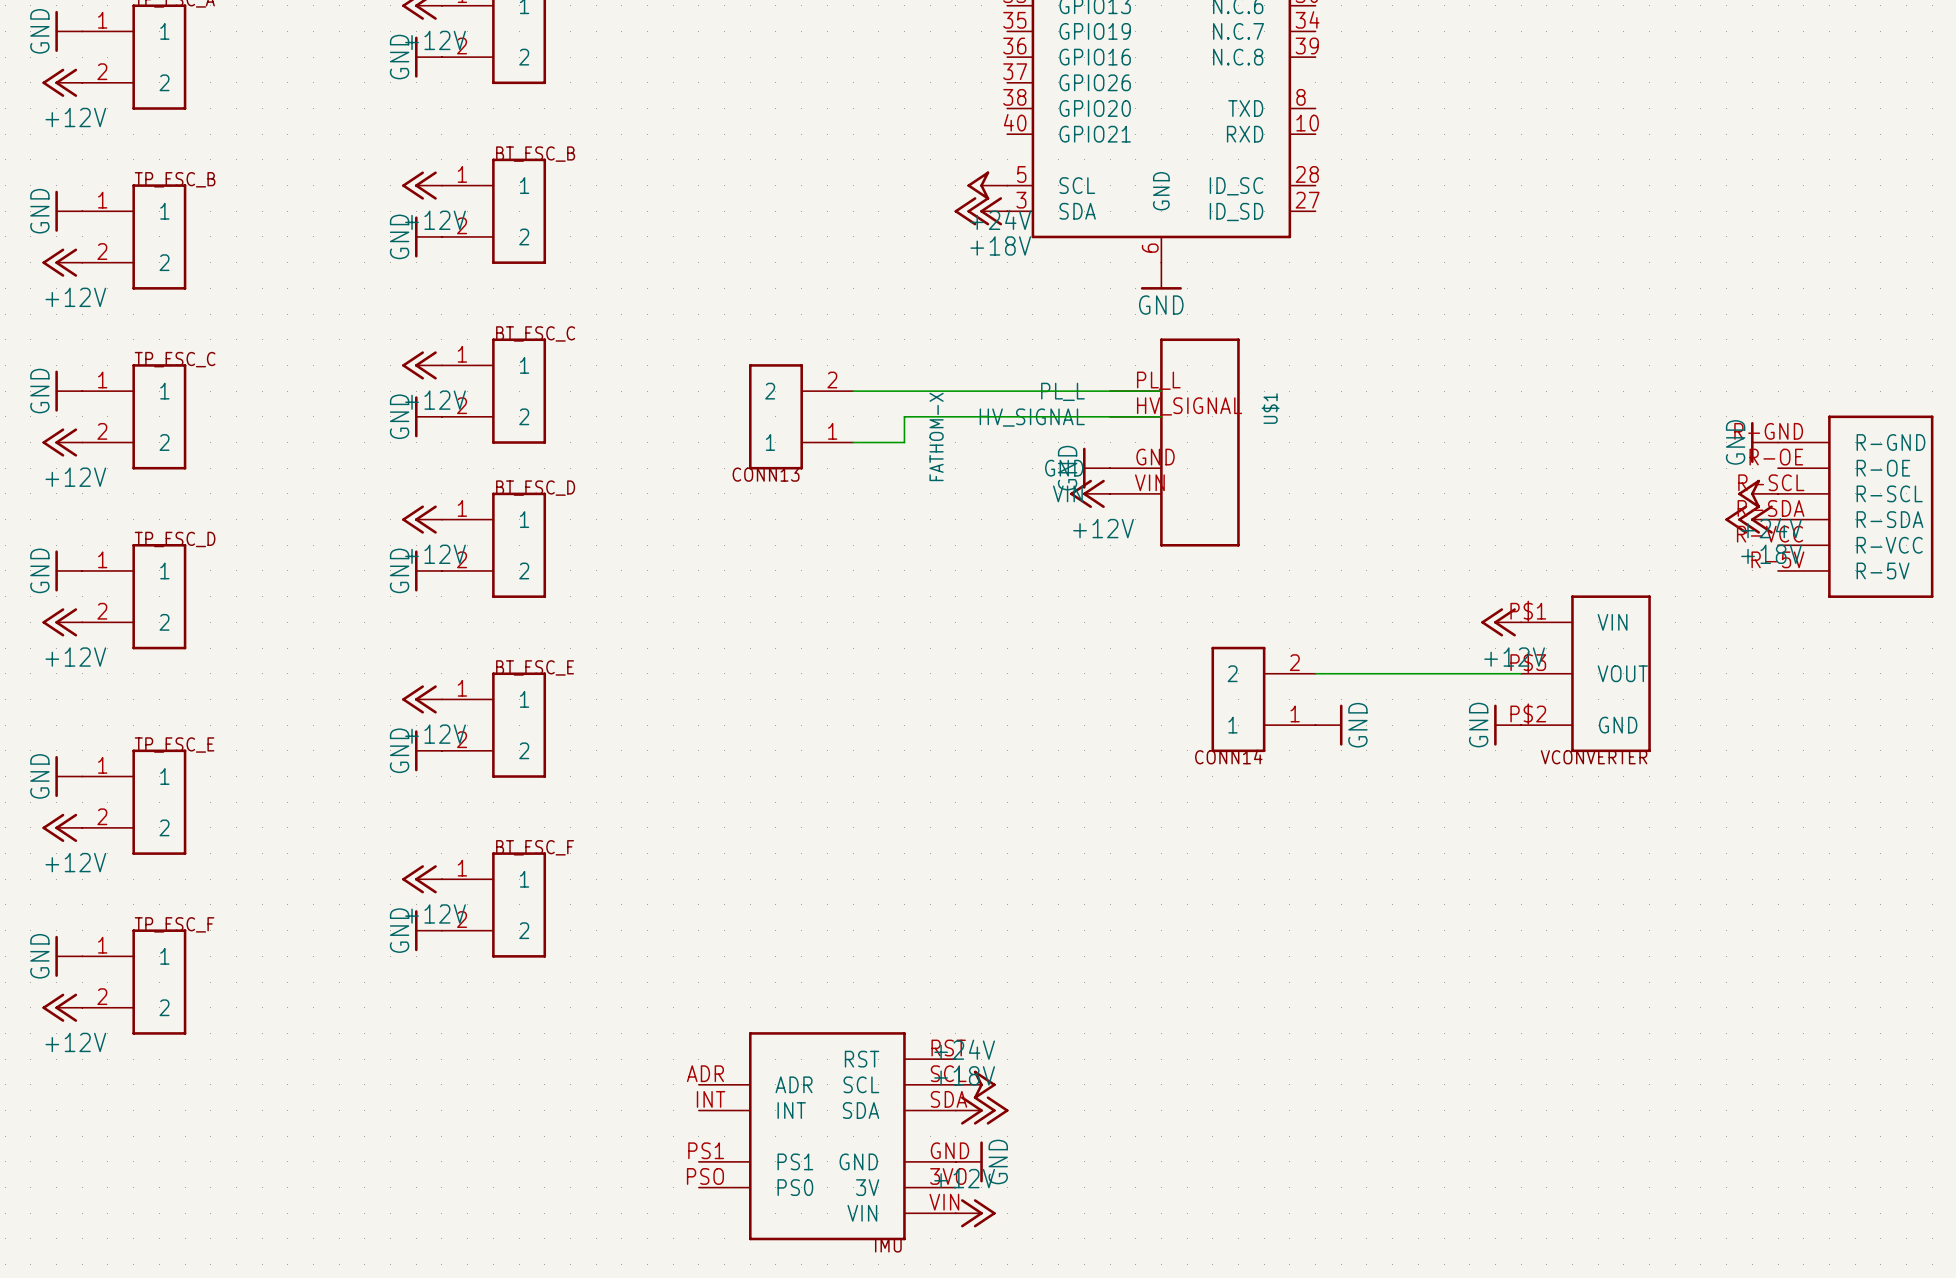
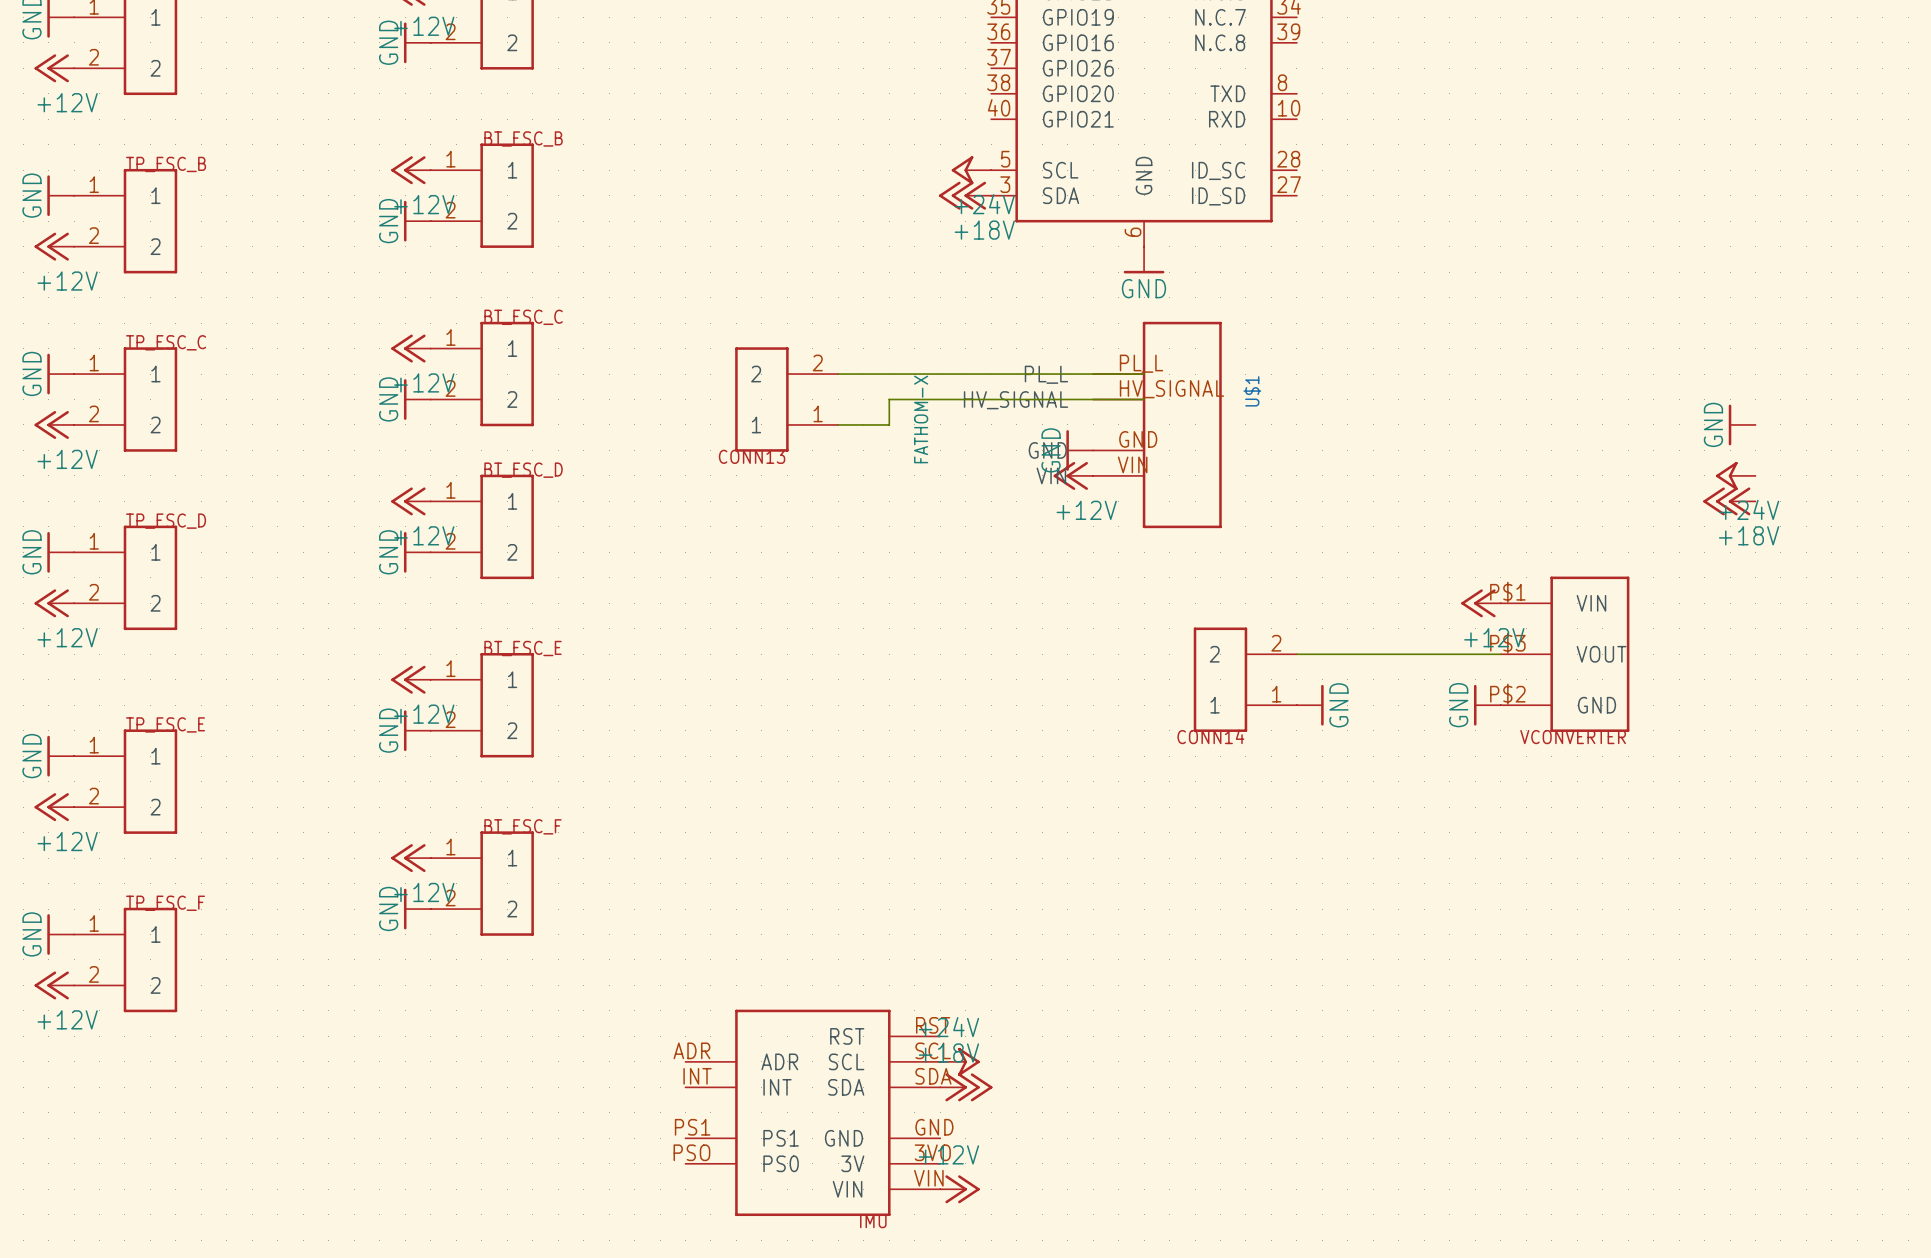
part: (1855, 506) -> none
power symbol: GND (969, 1161) -> none

